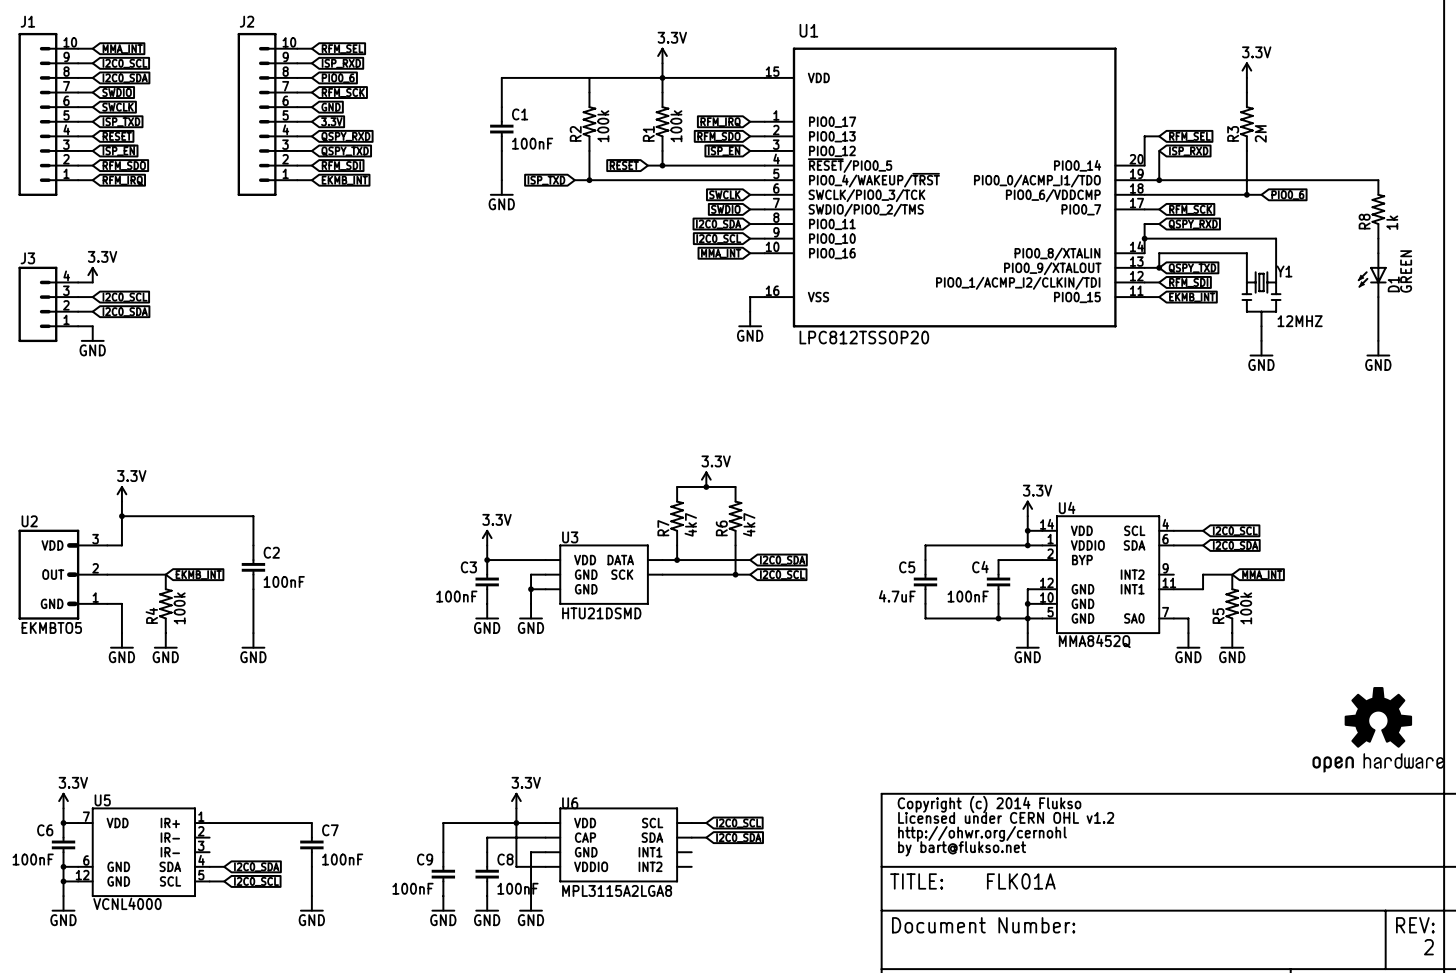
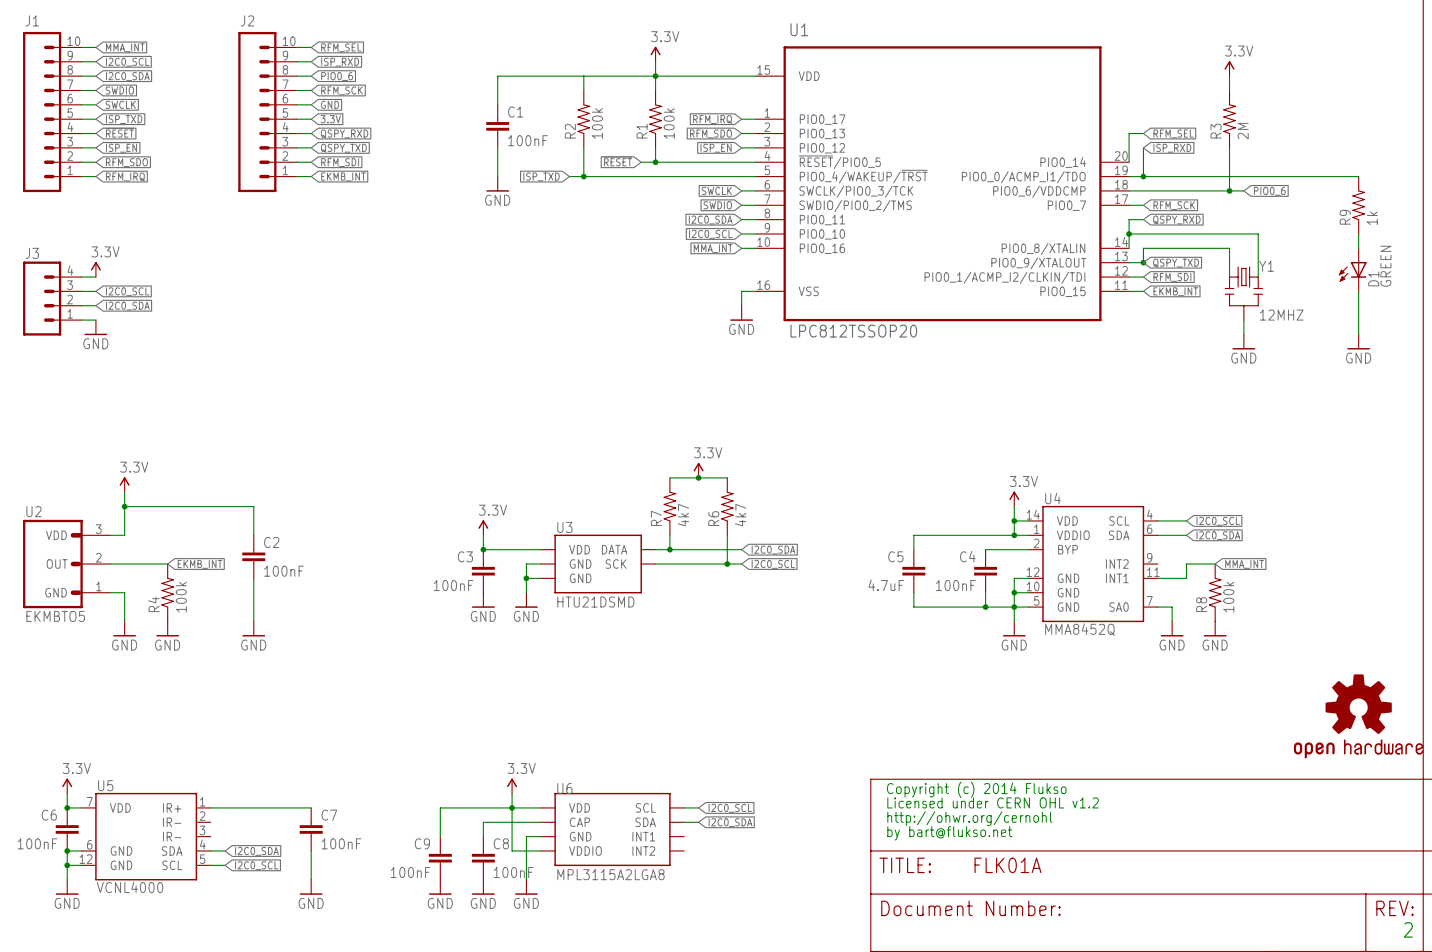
R8 name: R8 (1364, 221) -> R9 (1345, 217)
R5 name: R5 (1218, 616) -> R8 (1201, 604)

